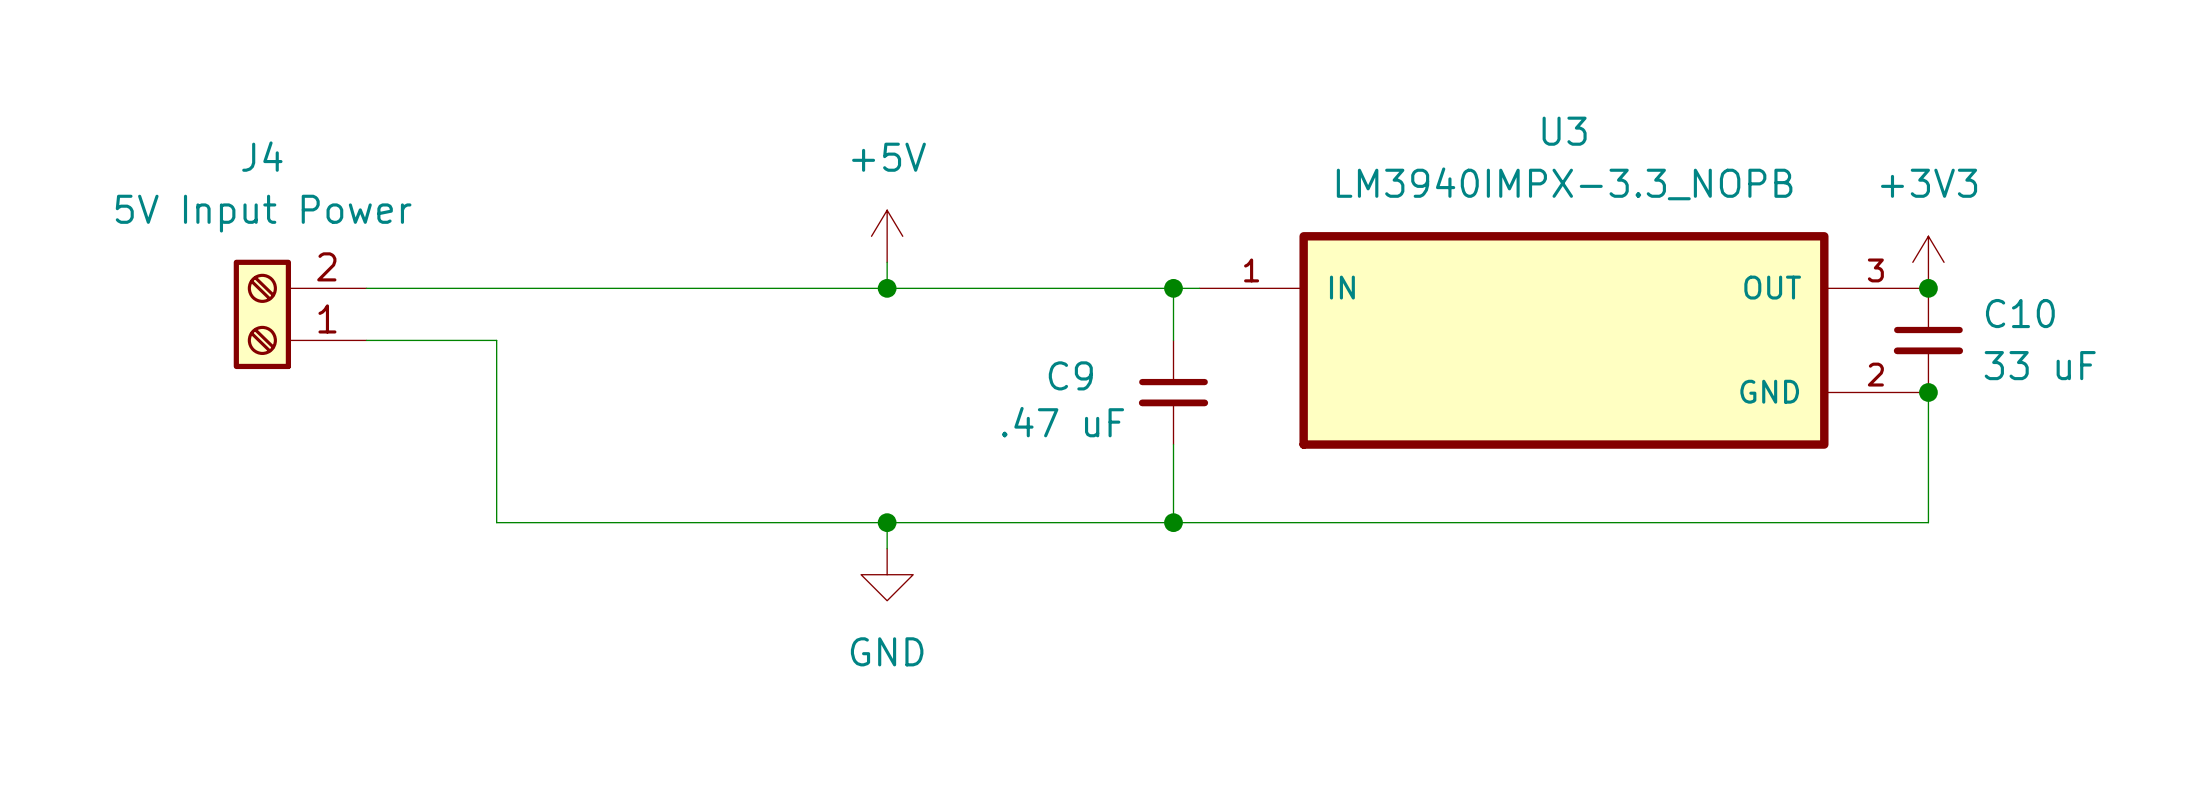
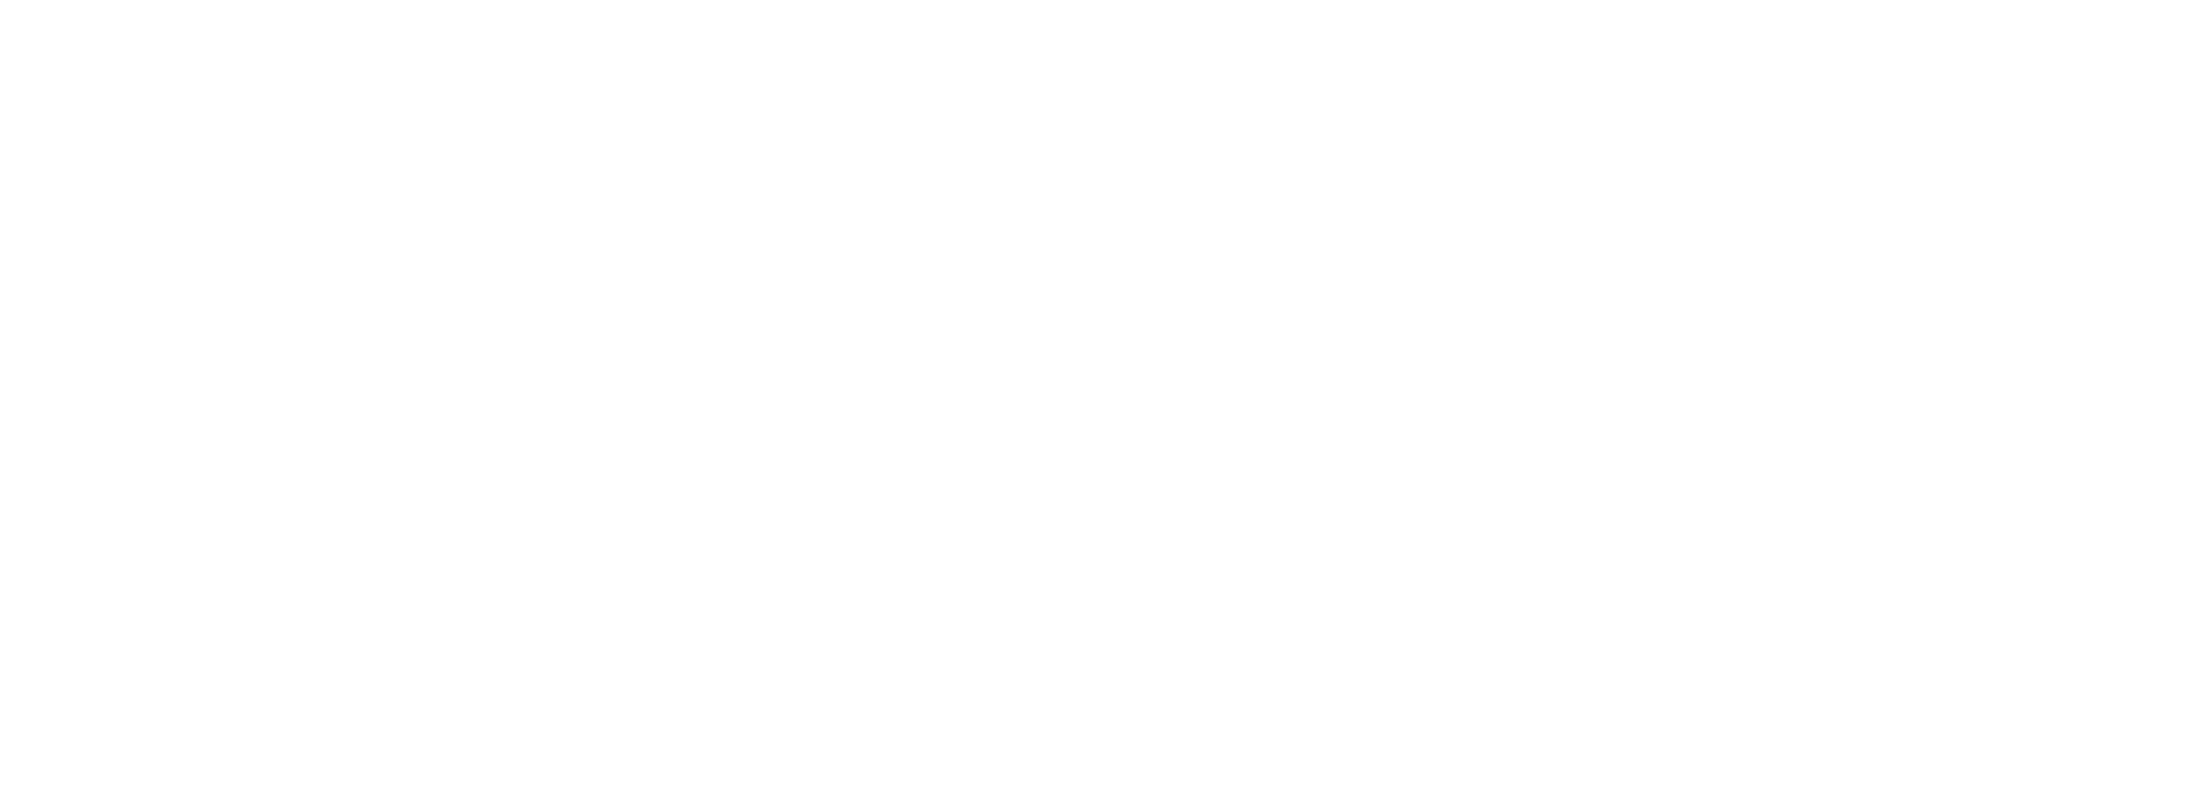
power symbol: +5V (887, 236) -> none
wire: (887, 262) (887, 288) -> none
power symbol: +3V3 (1928, 262) -> none
wire: (366, 288) (1199, 288) -> none
junction: (887, 288) -> none
wire: (1173, 288) (1173, 340) -> none
junction: (1173, 288) -> none
junction: (1928, 288) -> none
J4: 5V Input Power (300, 314) -> none
wire: (366, 340) (496, 340) (496, 522) (1928, 522) (1928, 392) -> none
U3: LM3940IMPX-3.3_NOPB (1563, 340) -> none
C10: 33 uF (1928, 340) -> none
C9: .47 uF (1173, 392) -> none
junction: (1928, 392) -> none
wire: (1173, 444) (1173, 522) -> none
wire: (887, 522) (887, 548) -> none
junction: (887, 522) -> none
junction: (1173, 522) -> none
power symbol: GND (887, 574) -> none

